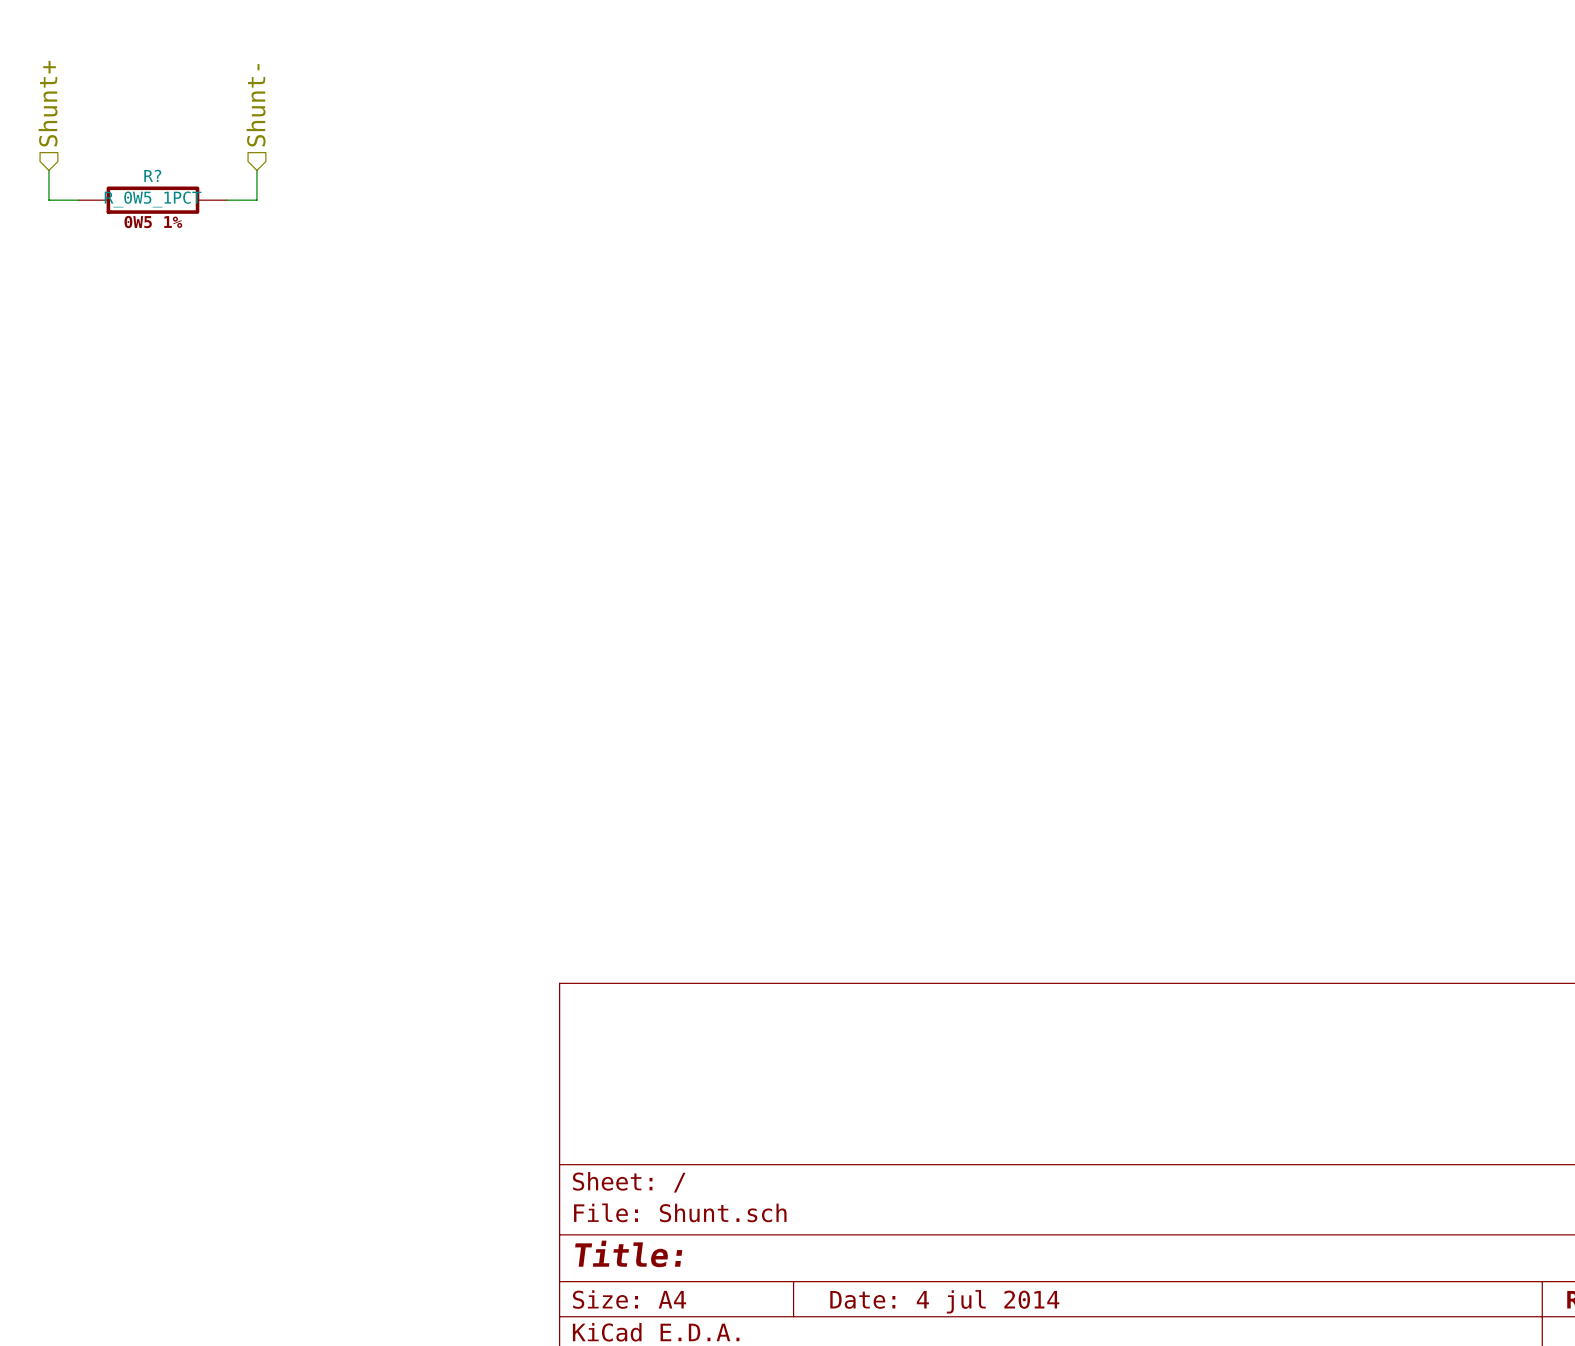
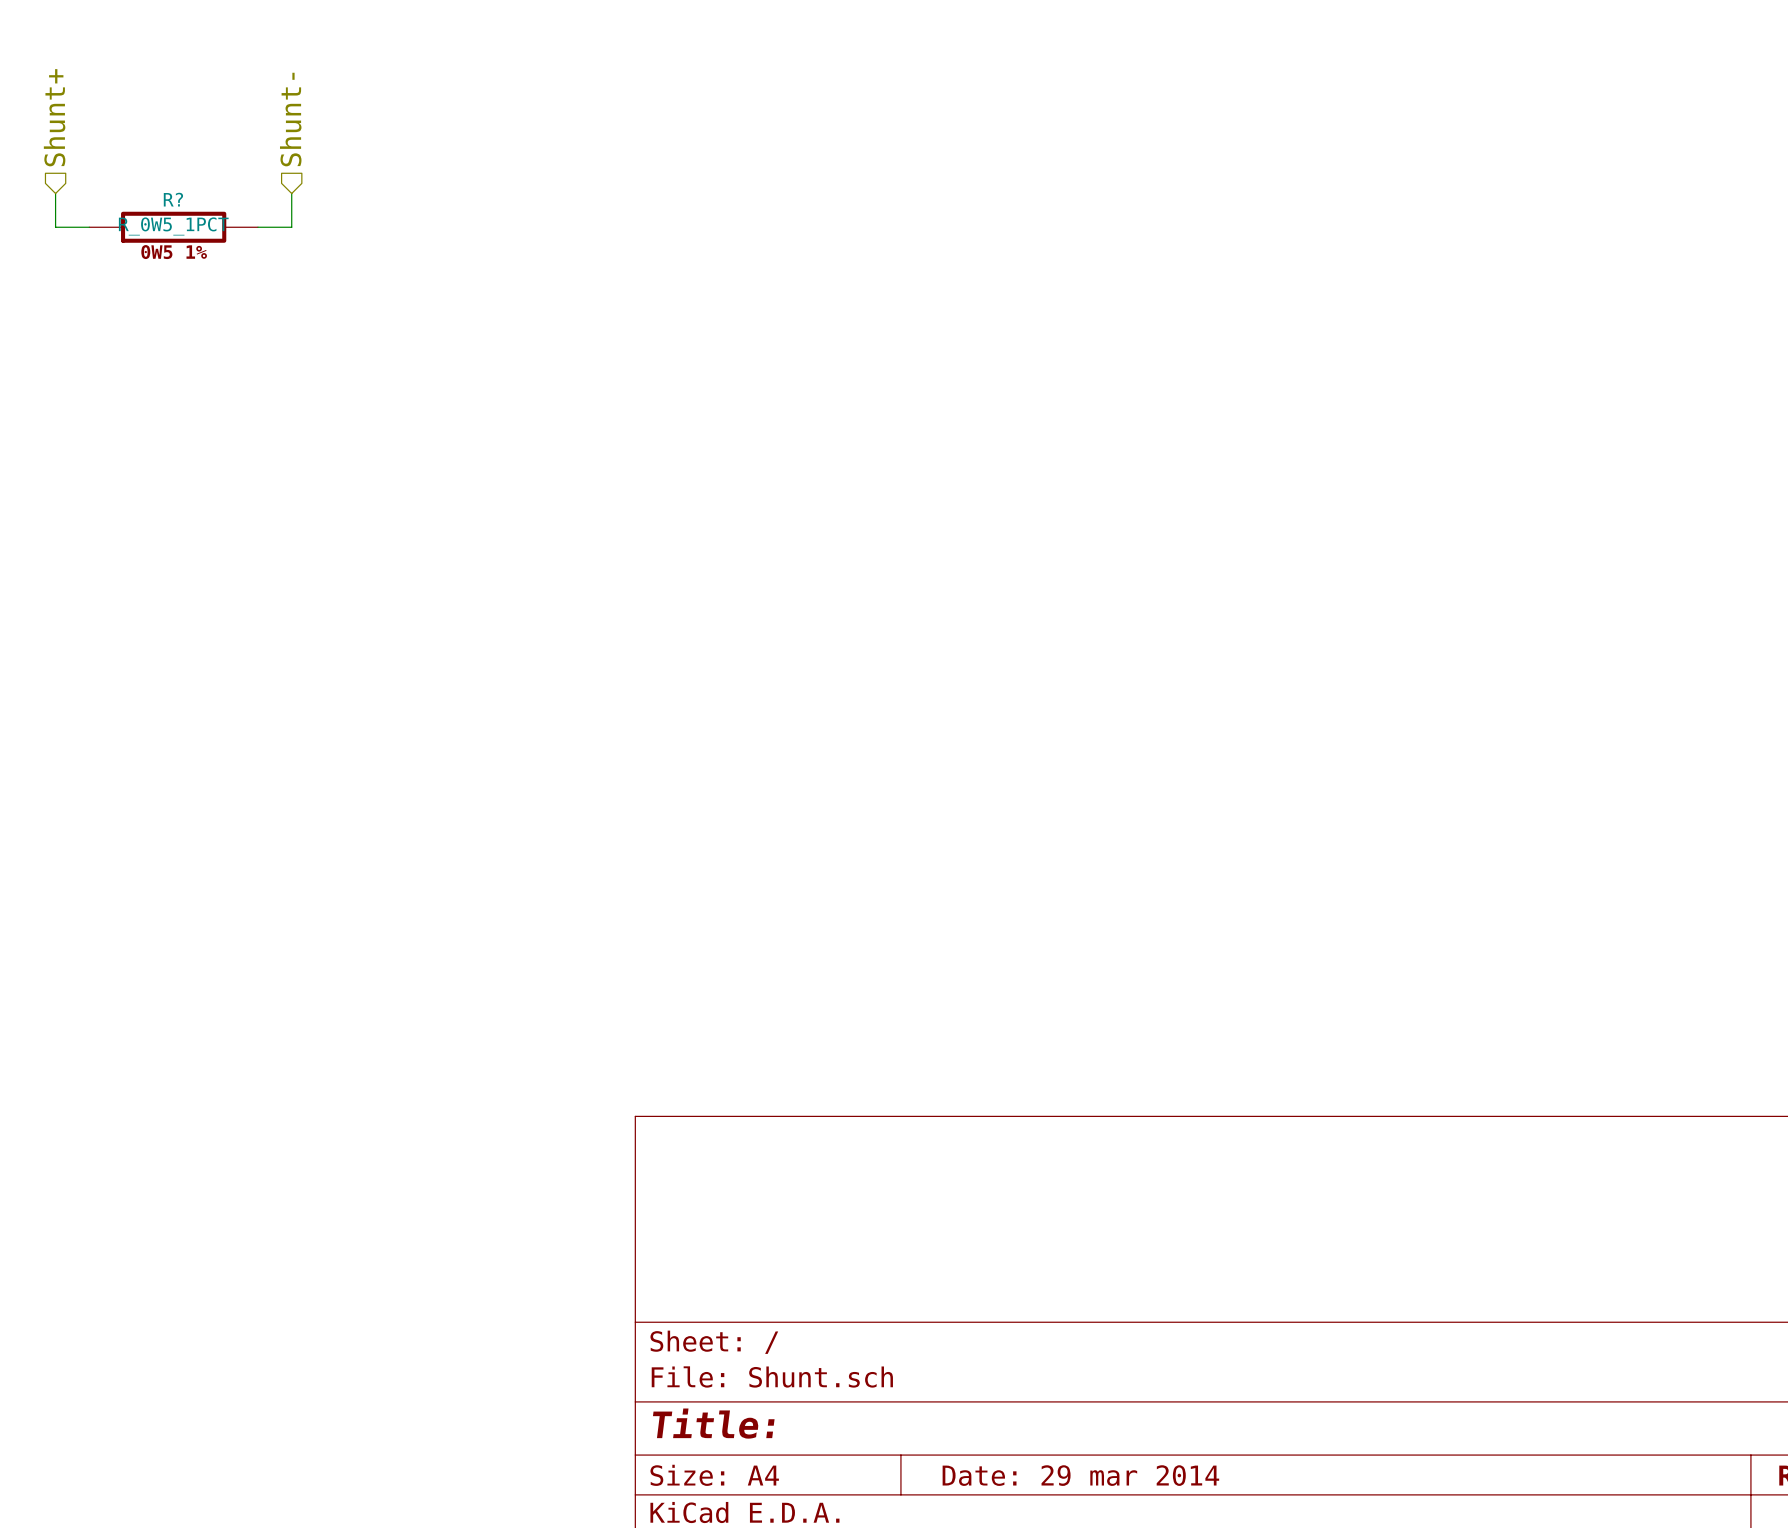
title block: Date: 4 jul 2014 (944, 1301) -> Date: 29 mar 2014 (1080, 1475)

